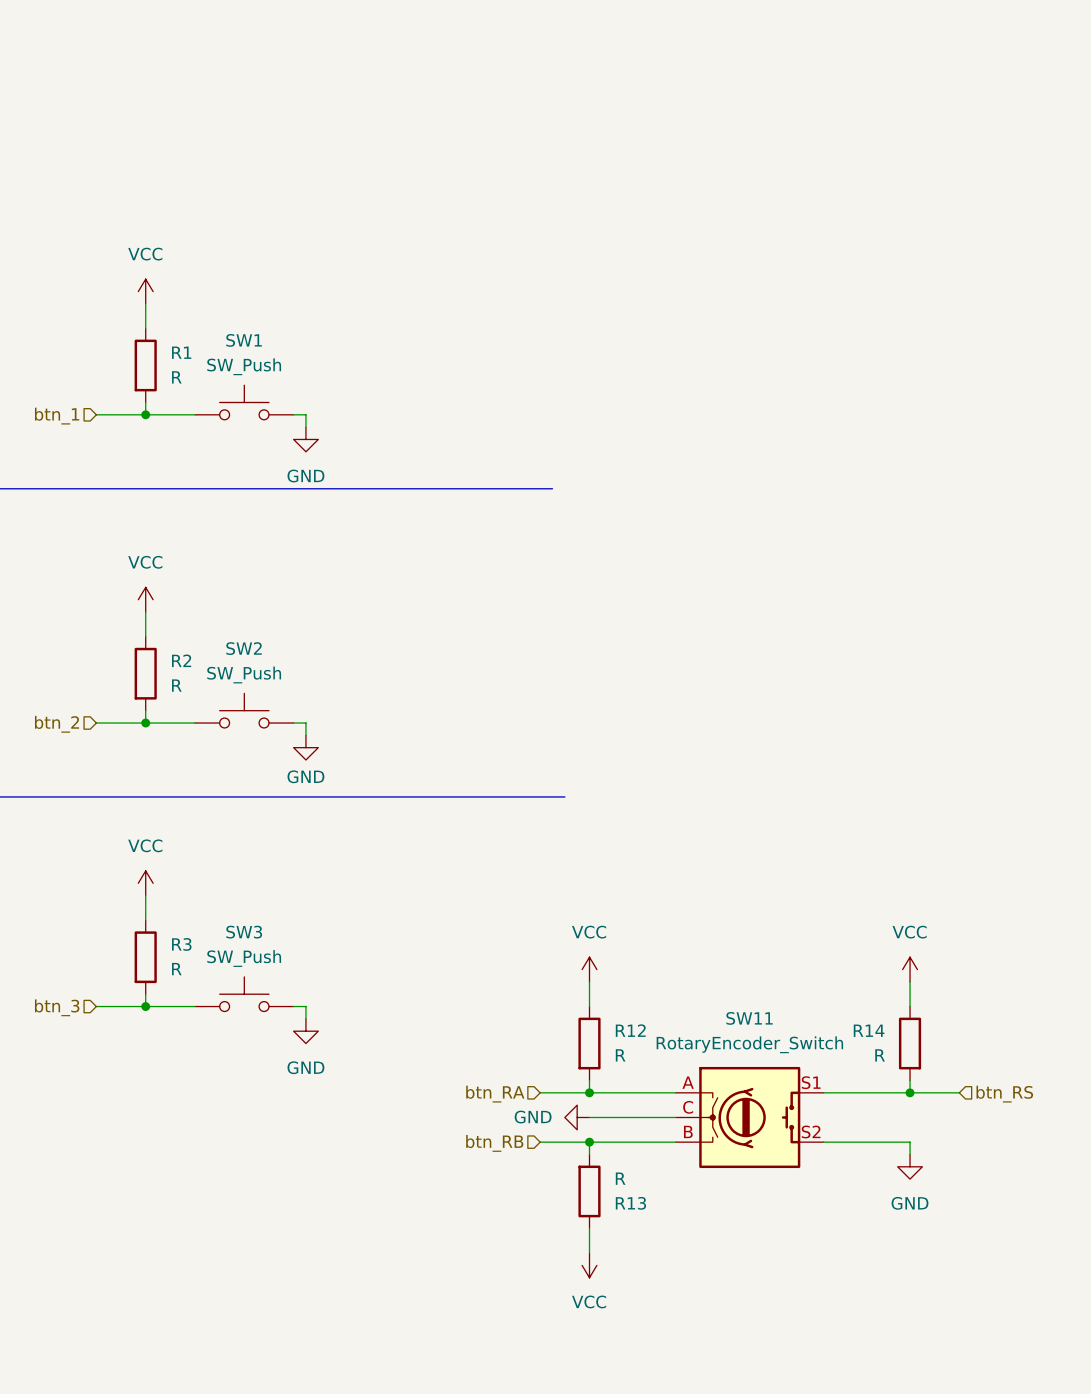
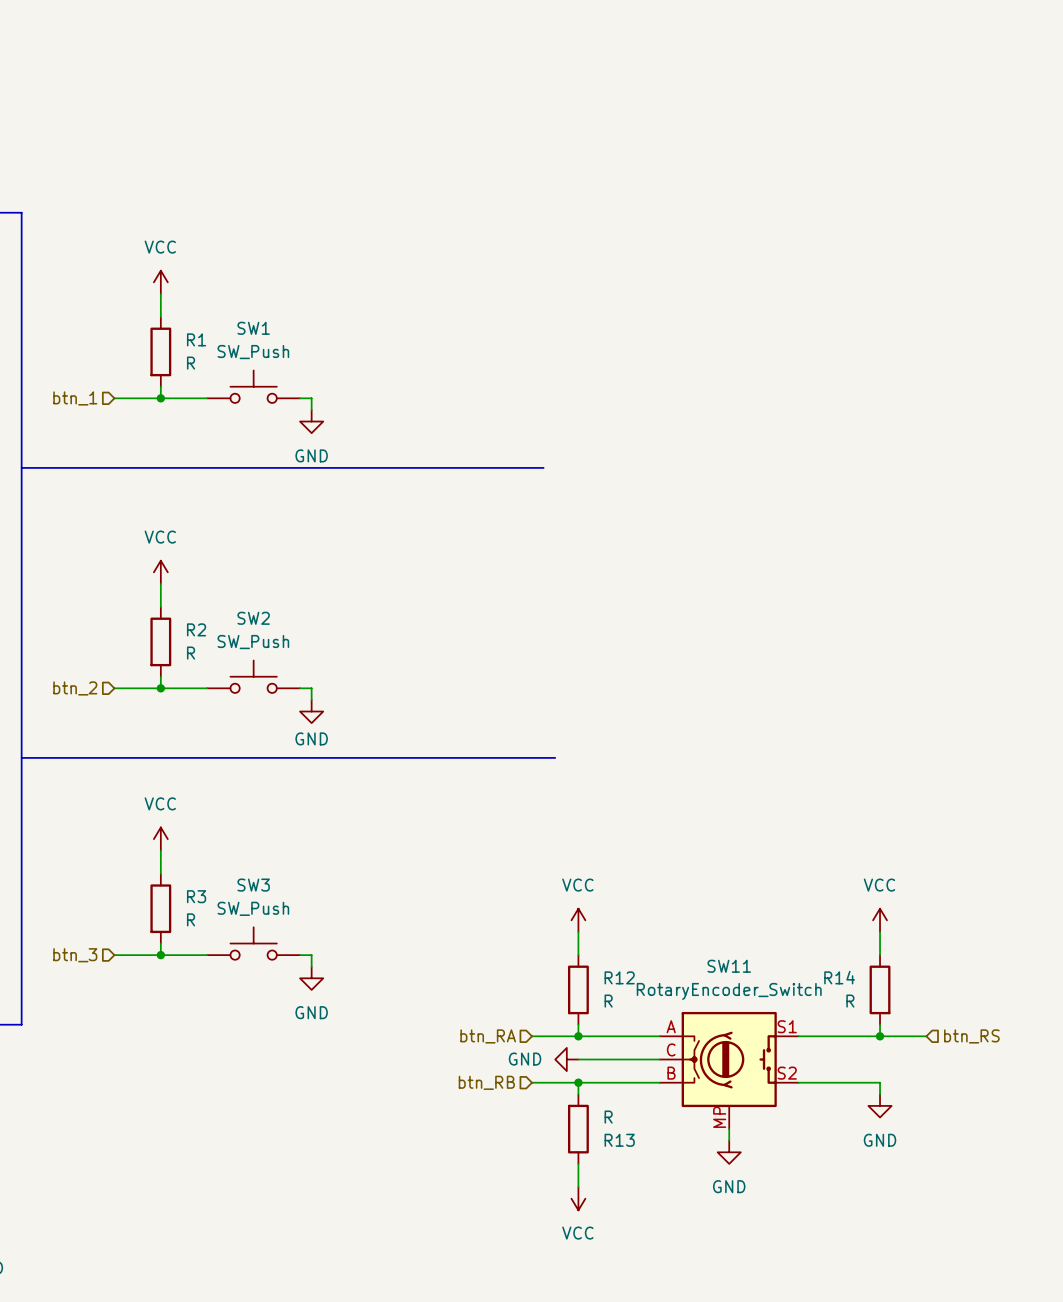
SW11 symbol: [675, 1066, 824, 1169] -> [659, 1011, 799, 1130]
wire: none -> (729, 1129) (729, 1140)
power symbol: none -> GND (729, 1152)

